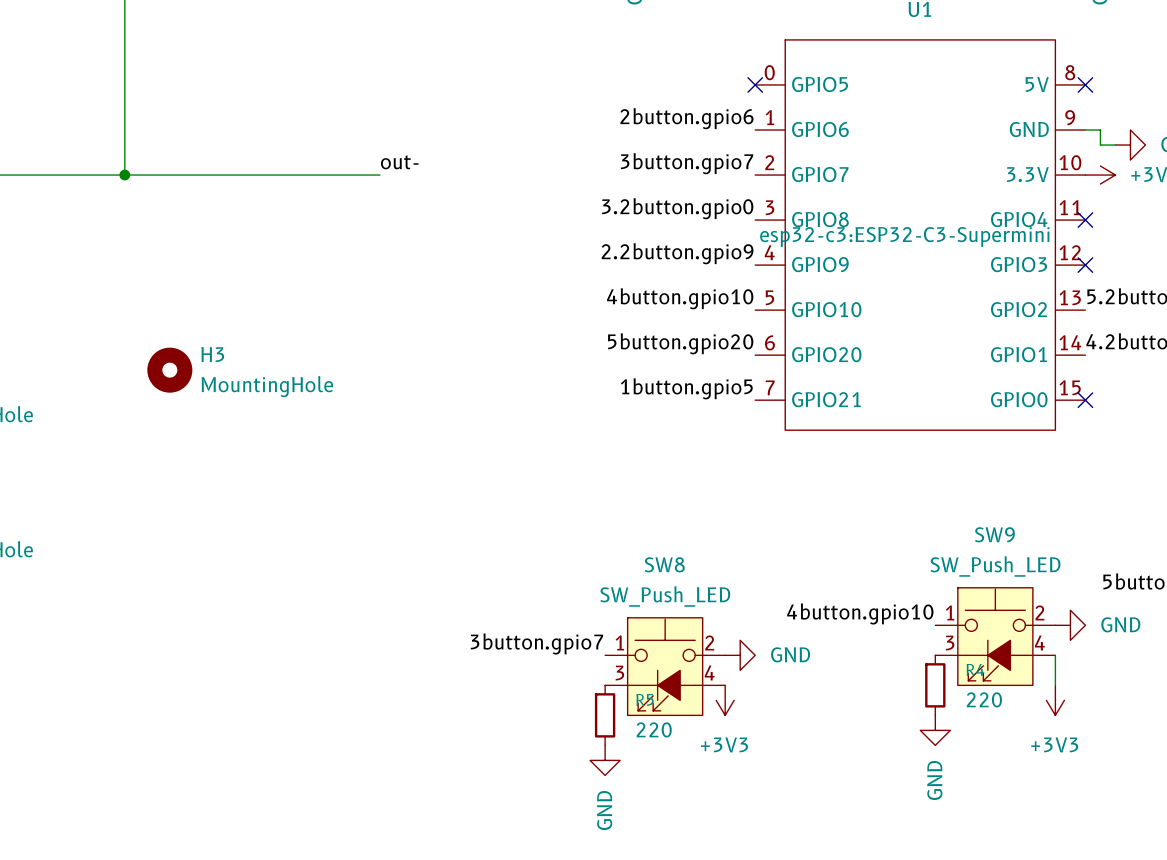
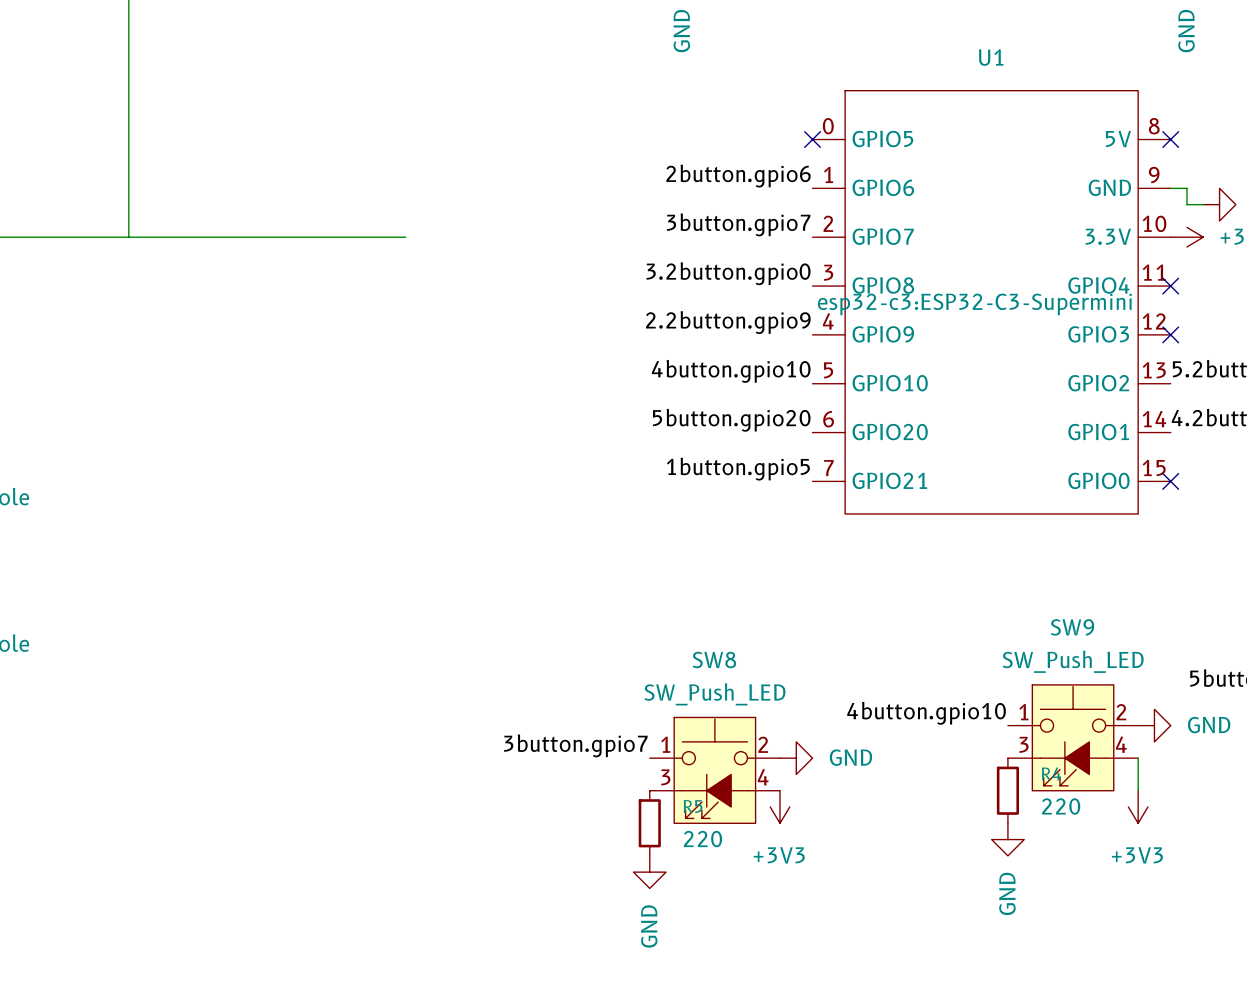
label: out- (399, 162) -> none
junction: (124, 175) -> none
H3: MountingHole (169, 370) -> none

